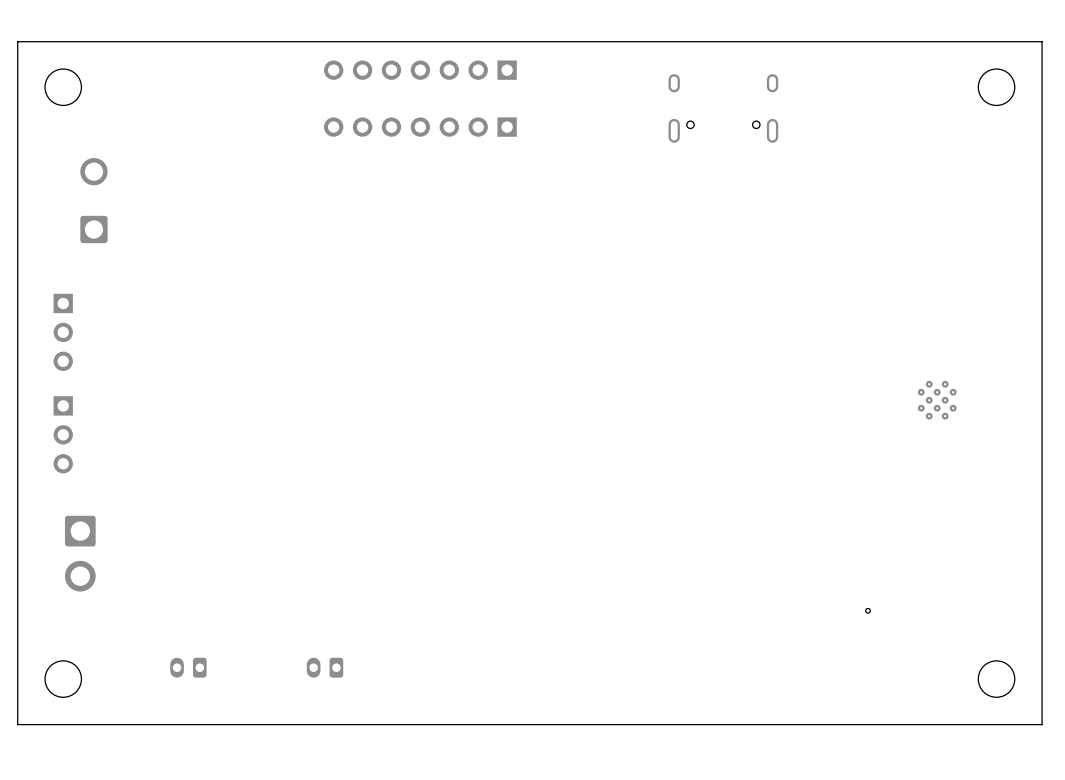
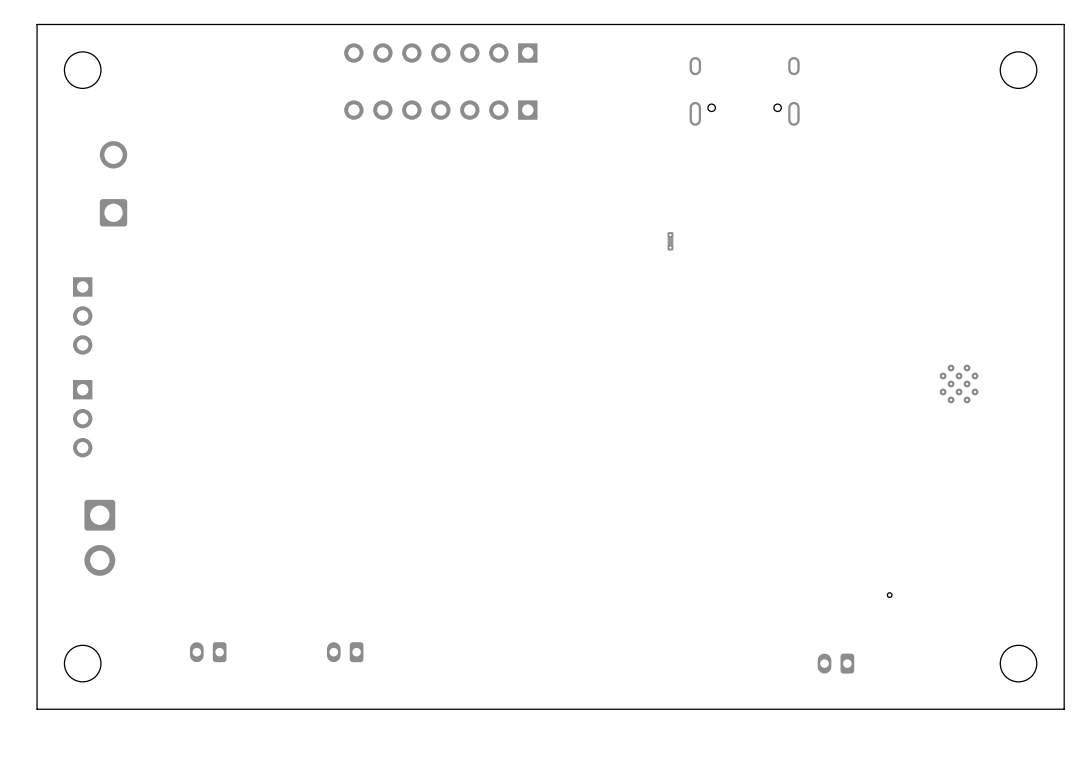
part: none -> (670, 241)
part: none -> (835, 663)

